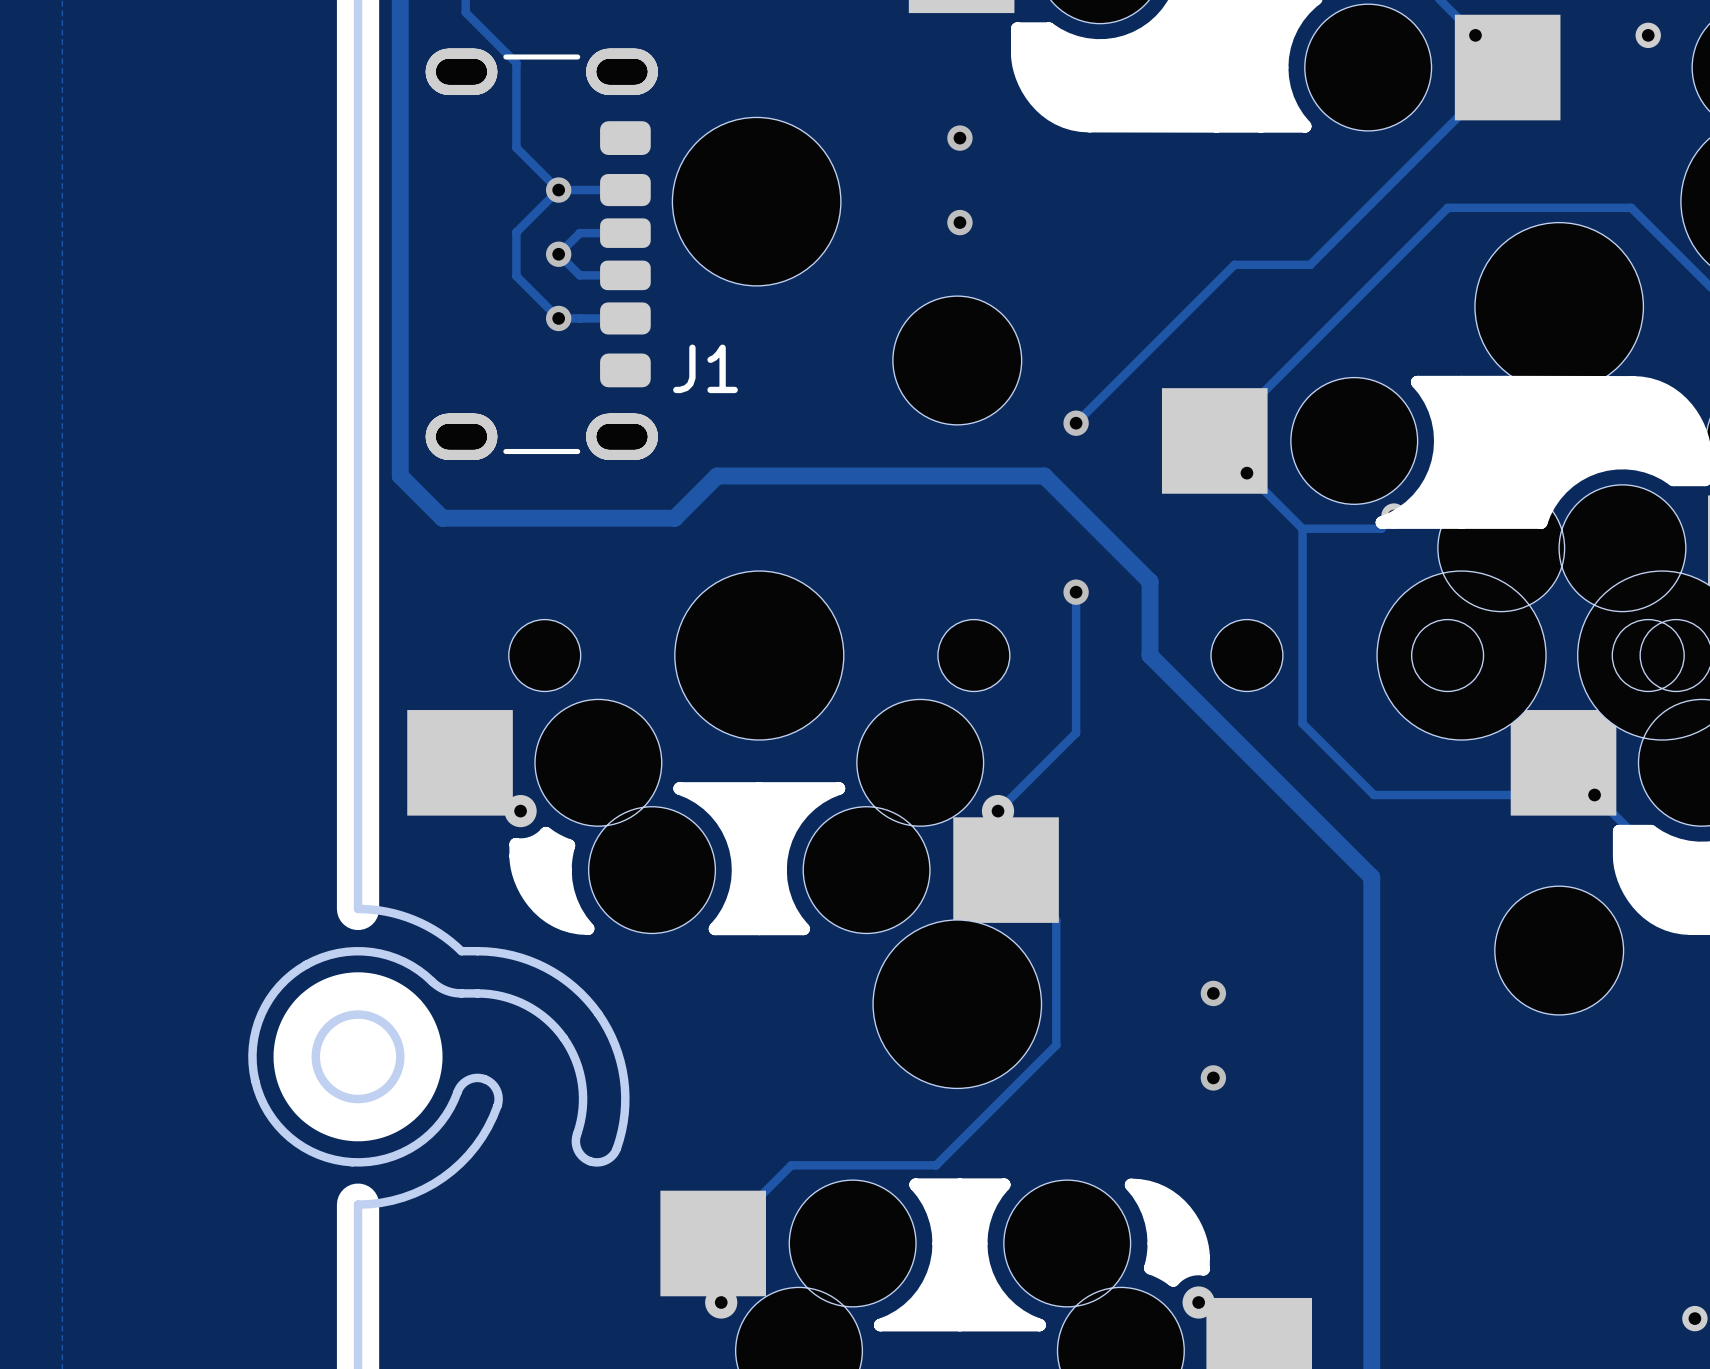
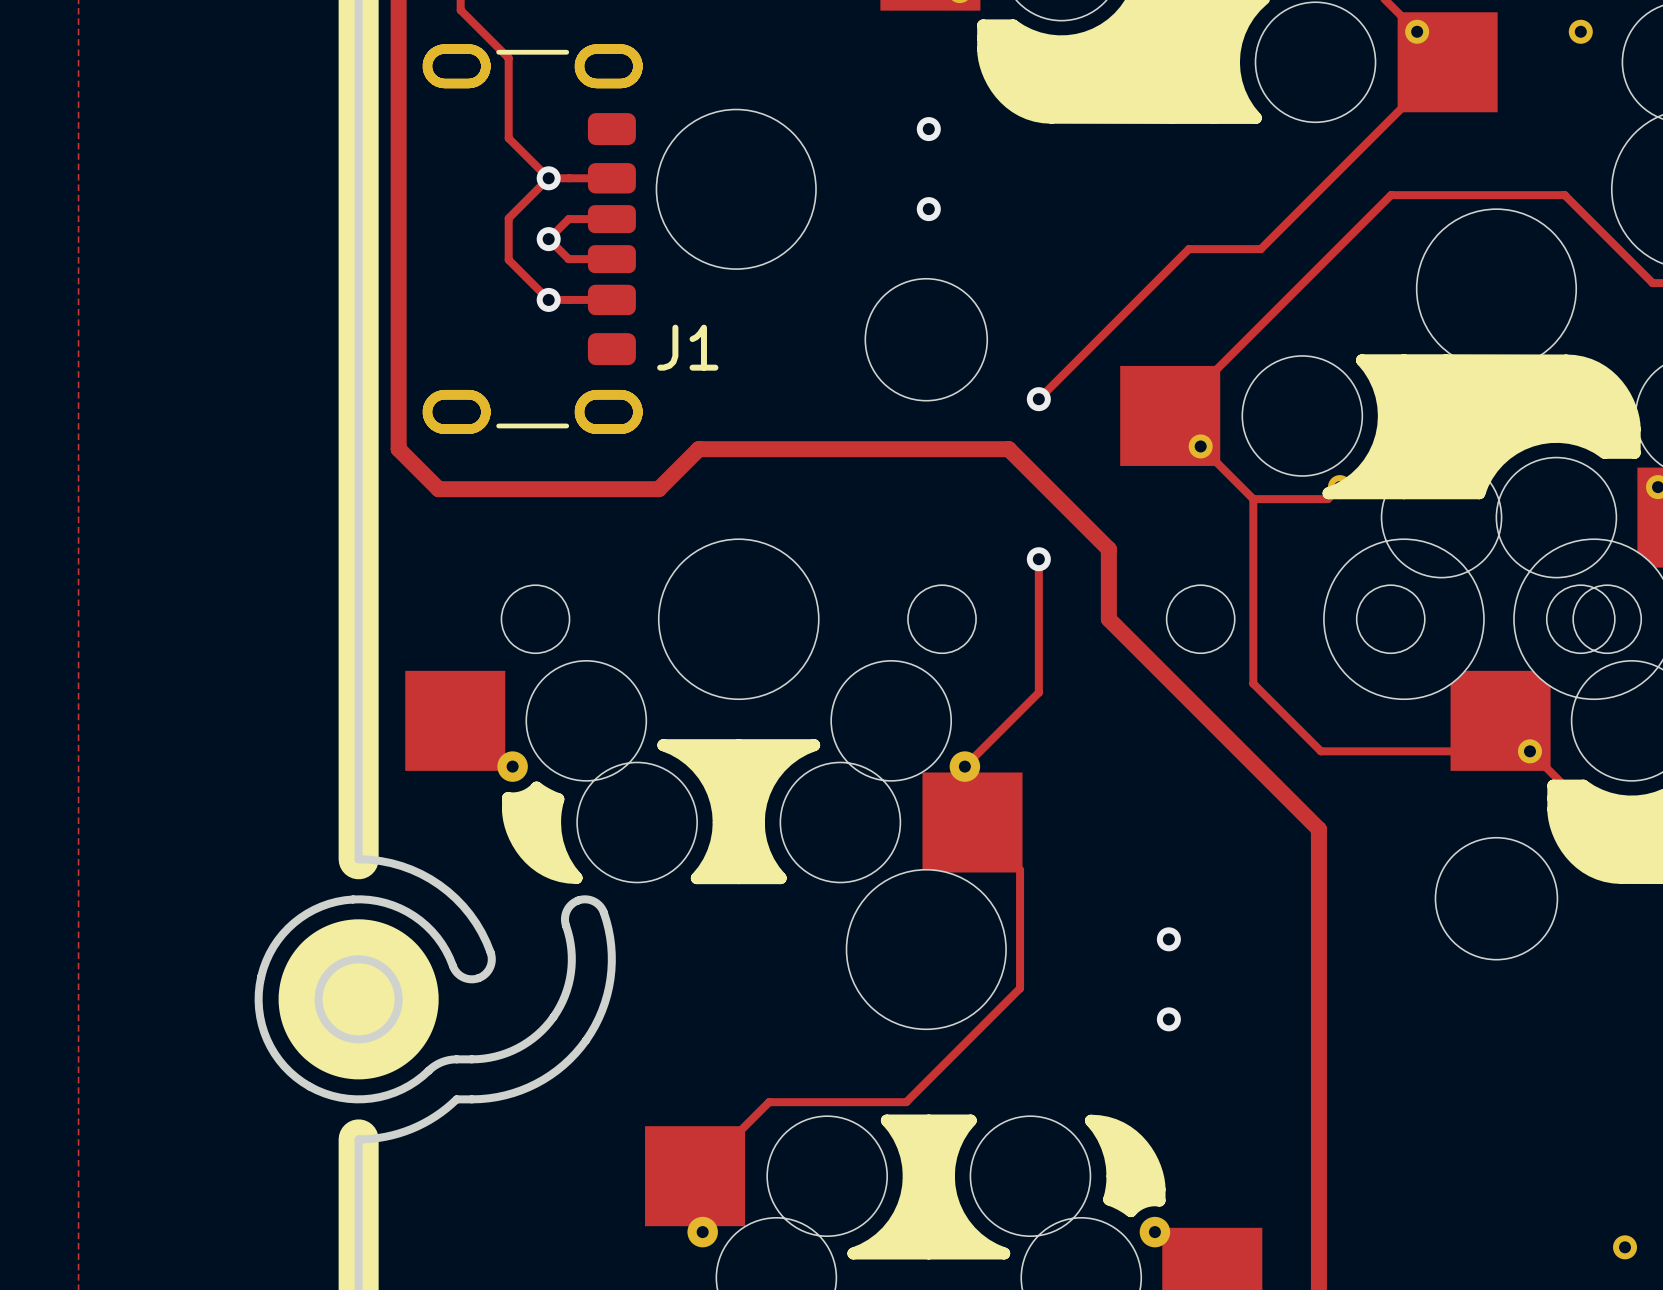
board edge: (358, 908) (379, 910) (407, 917) (439, 933) (461, 951) (486, 951) (512, 955) (537, 963) (560, 976) (587, 999) (607, 1028) (620, 1061) (625, 1096) (623, 1122) (615, 1152) (609, 1158) (602, 1161) (587, 1160) (580, 1153) (575, 1142) (583, 1103) (582, 1084) (577, 1066) (563, 1038) (541, 1015) (520, 1002) (502, 996) (457, 993) (445, 990) (411, 965) (388, 955) (355, 951) (322, 957) (298, 969) (279, 986) (265, 1006) (254, 1038) (252, 1063) (257, 1089) (268, 1112) (290, 1137) (311, 1151) (334, 1159) (352, 1162) (377, 1160) (401, 1152) (429, 1134) (446, 1115) (459, 1088) (466, 1080) (476, 1077) (486, 1079) (494, 1086) (498, 1095) (497, 1106) (482, 1137) (468, 1155) (452, 1170) (424, 1189) (403, 1197) (381, 1202) (358, 1204) -> (358, 859) (380, 861) (401, 866) (421, 874) (447, 891) (463, 906) (476, 923) (490, 952) (491, 962) (487, 971) (480, 977) (470, 979) (461, 976) (454, 969) (442, 944) (426, 925) (400, 908) (377, 901) (353, 899) (336, 901) (314, 909) (294, 922) (273, 946) (263, 968) (258, 993) (260, 1017) (270, 1046) (284, 1066) (302, 1082) (324, 1093) (355, 1099) (387, 1095) (409, 1085) (441, 1062) (452, 1059) (495, 1056) (512, 1050) (532, 1038) (553, 1017) (566, 990) (570, 973) (571, 955) (565, 918) (568, 907) (576, 901) (589, 899) (602, 908) (610, 937) (611, 962) (607, 994) (595, 1025) (575, 1053) (550, 1075) (528, 1087) (505, 1095) (480, 1099) (456, 1099) (435, 1116) (405, 1131) (379, 1137) (358, 1139)

